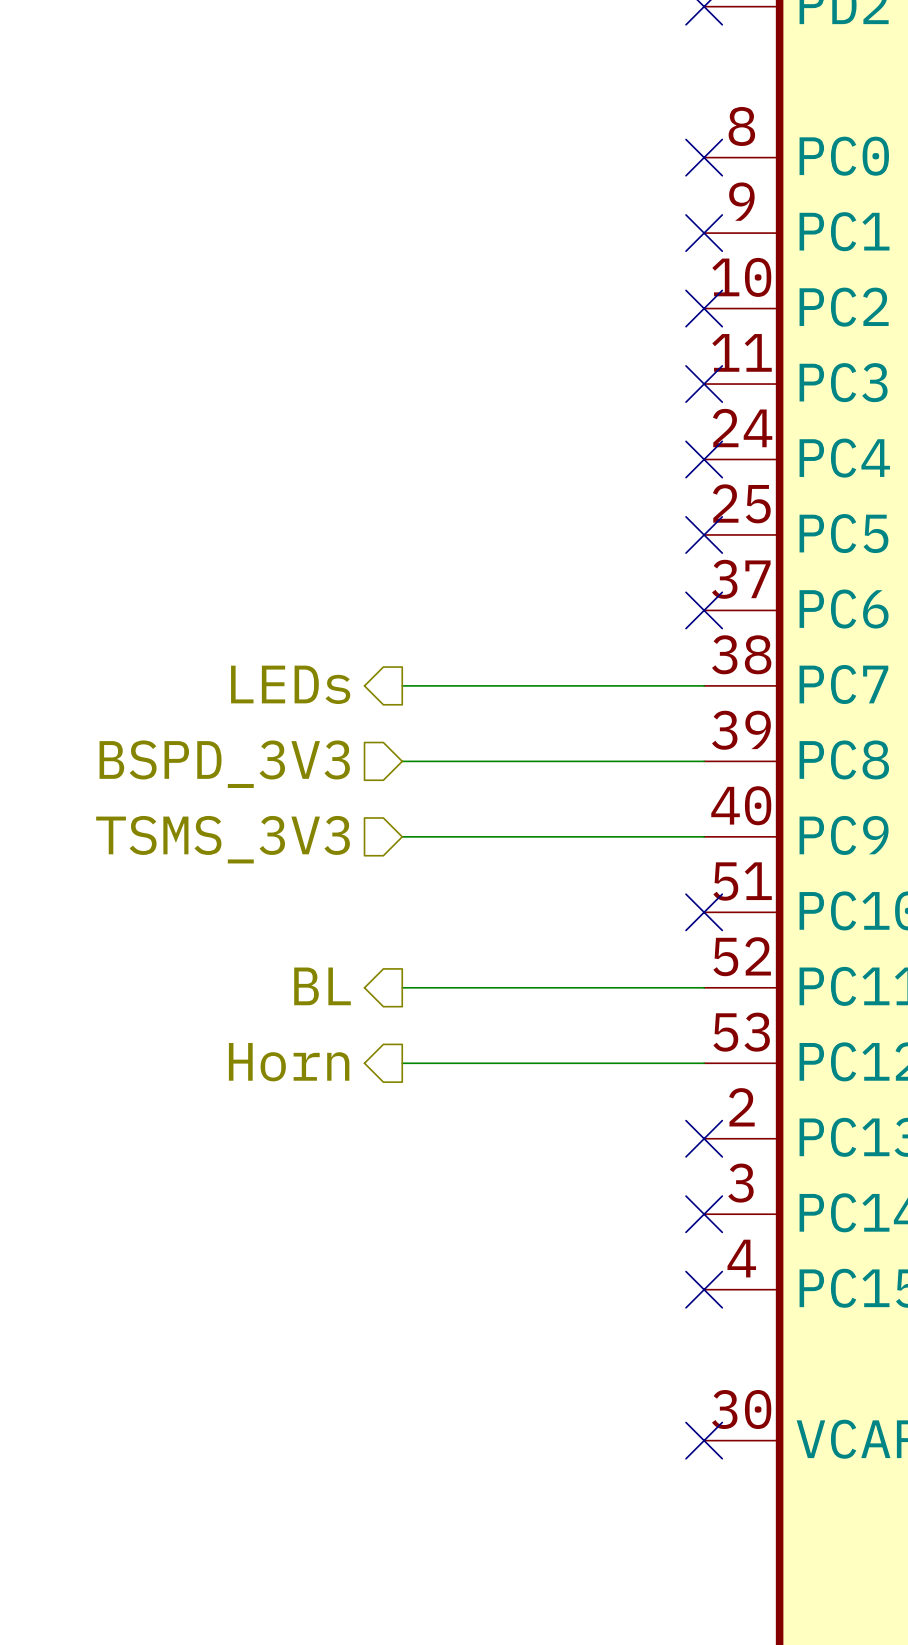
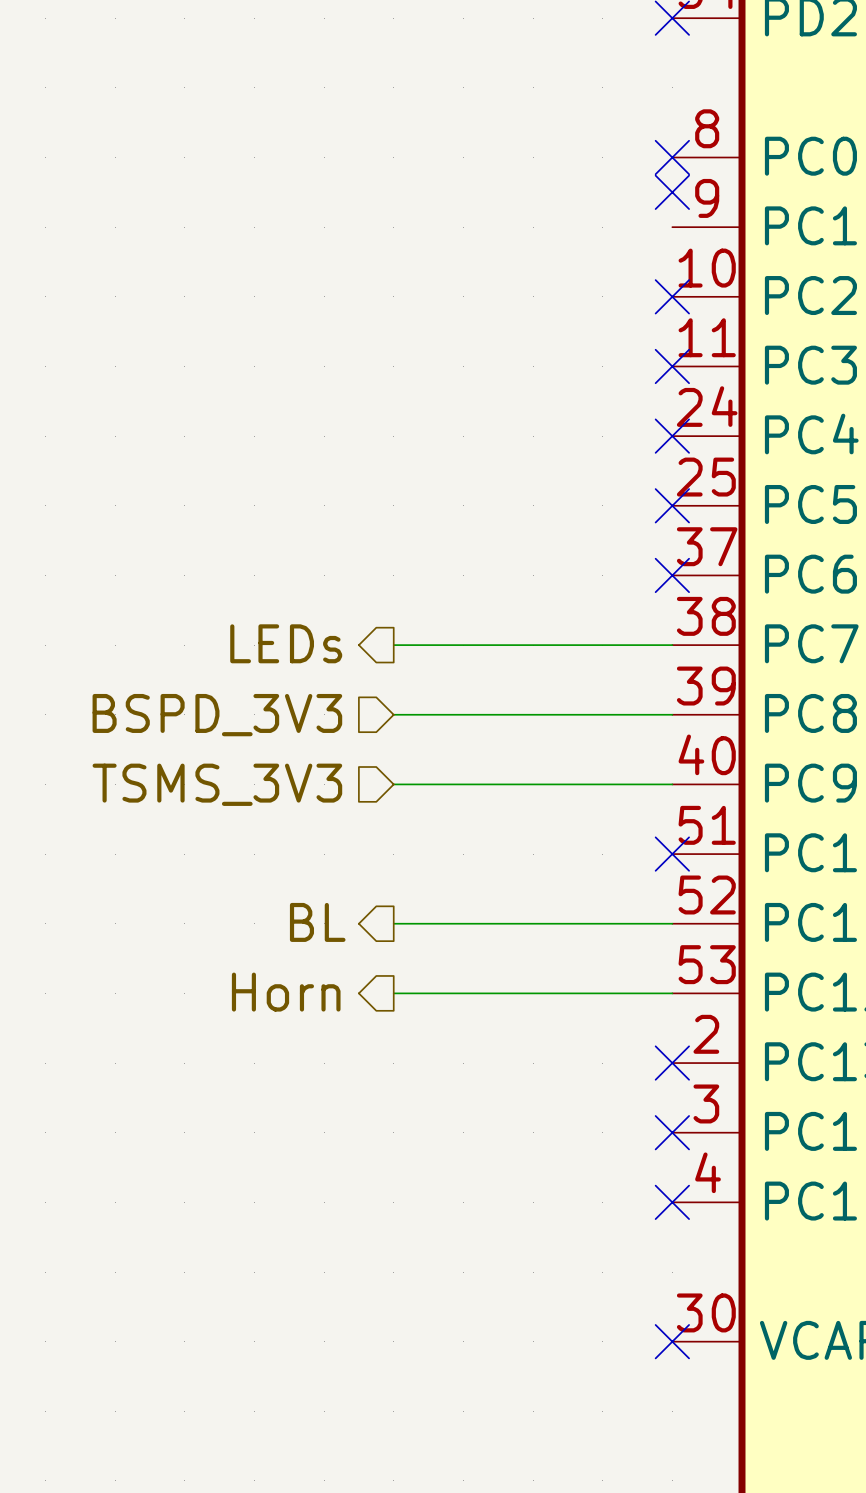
no-connect mark position: (704, 233) -> (672, 192)

